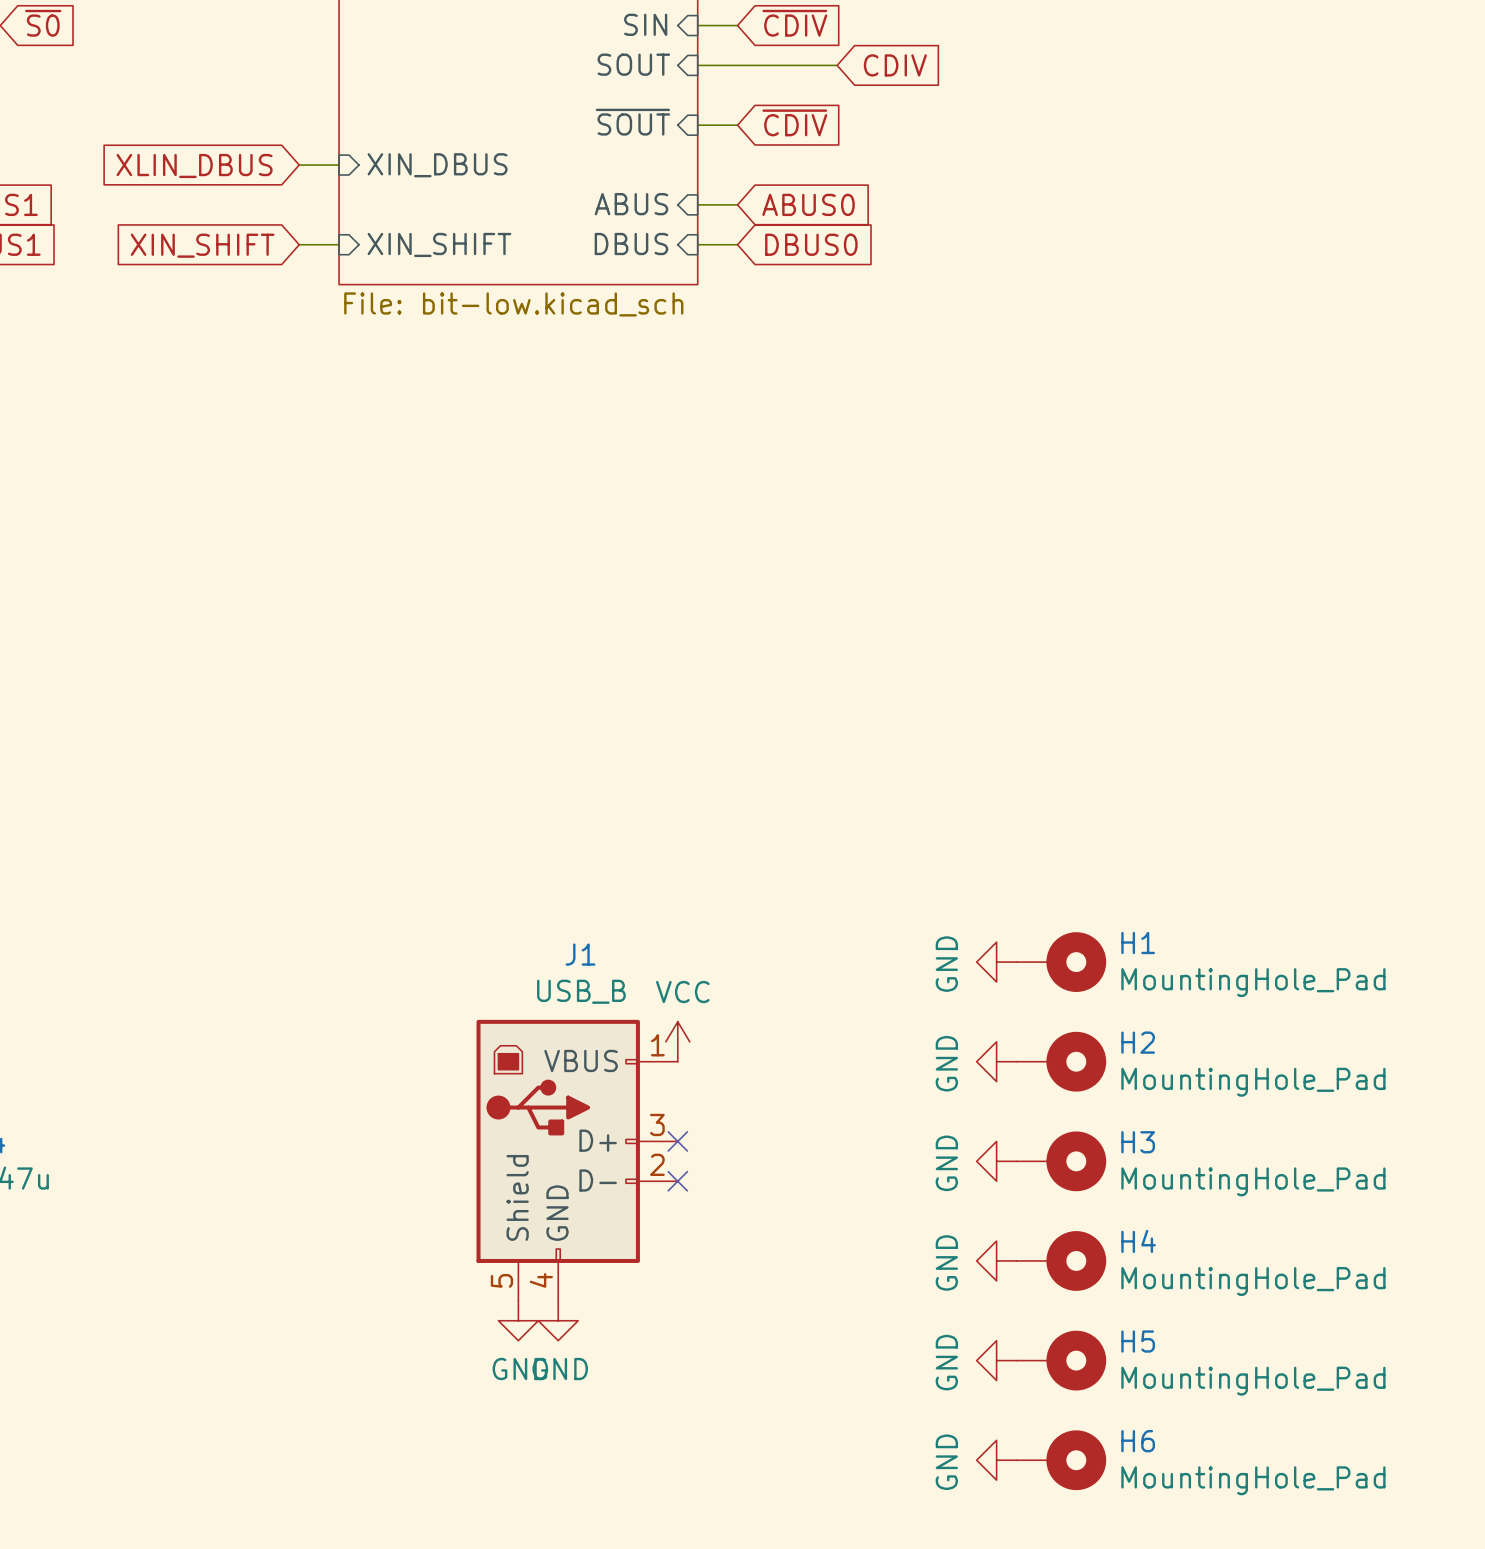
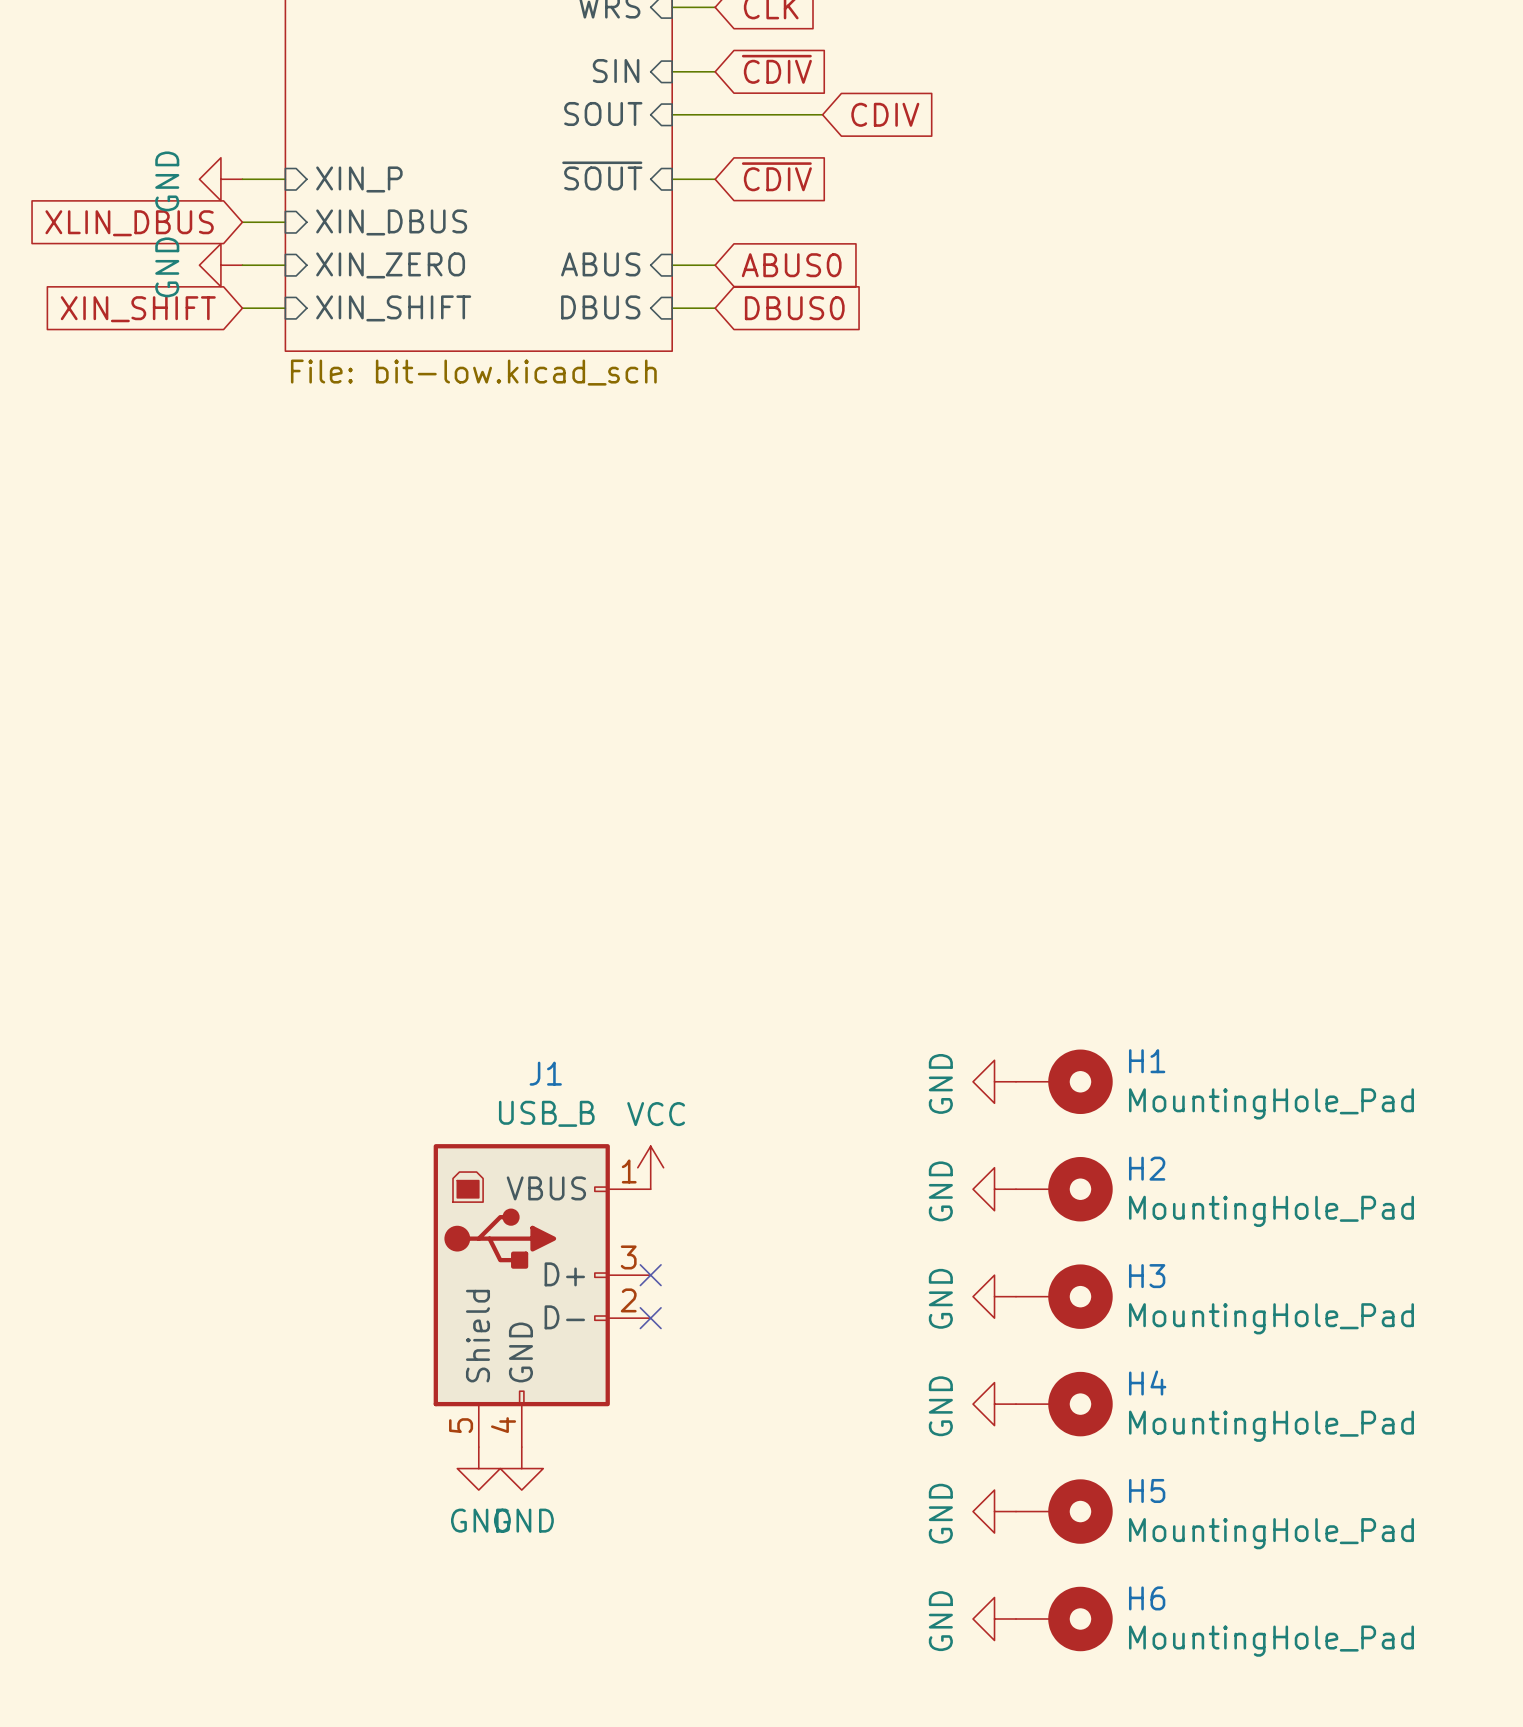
power symbol: none -> GND (220, 179)
wire: none -> (242, 179) (285, 179)
sheet pin: none -> XIN_P (359, 179)
power symbol: none -> GND (220, 265)
wire: none -> (242, 265) (285, 265)
sheet pin: none -> XIN_ZERO (390, 265)

